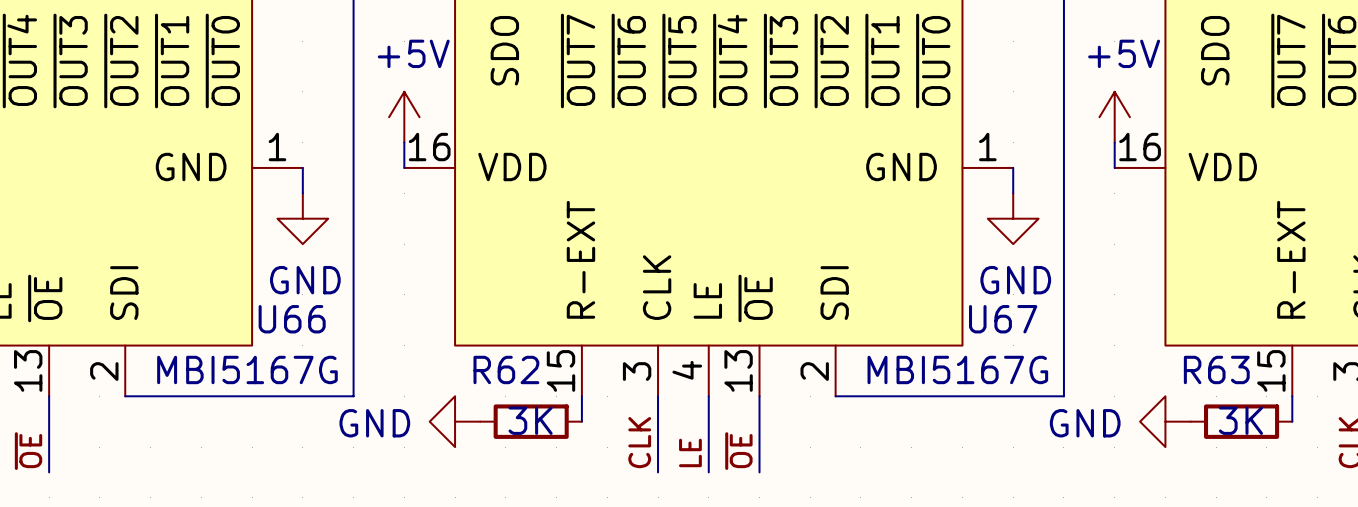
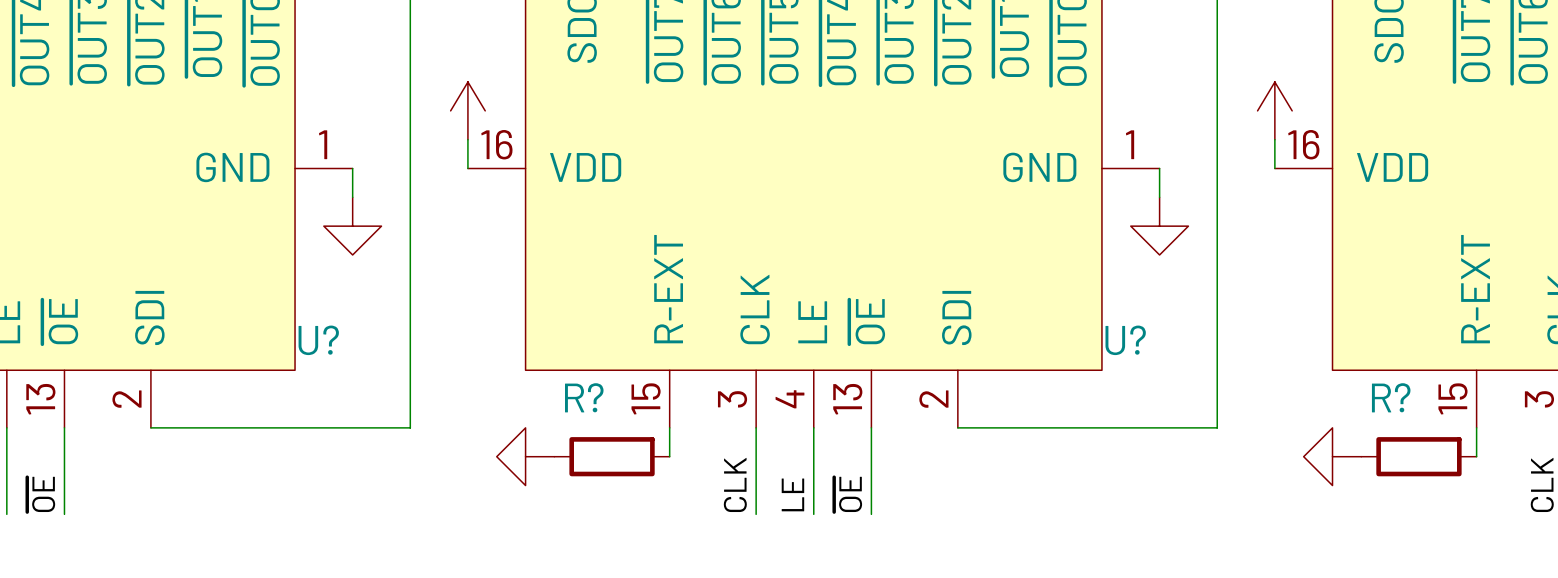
power symbol text: +5V (413, 53) -> none
power symbol text: +5V (1124, 53) -> none
power symbol text: GND (305, 280) -> none
power symbol text: GND (1015, 280) -> none
U66 name: U66 (292, 319) -> U? (318, 340)
U67 name: U67 (1003, 319) -> U? (1125, 340)
U66 value: MBI5167G (247, 369) -> none
R62 name: R62 (506, 369) -> R? (584, 397)
U67 value: MBI5167G (957, 369) -> none
R63 name: R63 (1216, 369) -> R? (1391, 397)
R62 value: 3K (530, 420) -> none
R63 value: 3K (1240, 420) -> none
power symbol text: GND (374, 423) -> none
power symbol text: GND (1085, 423) -> none

